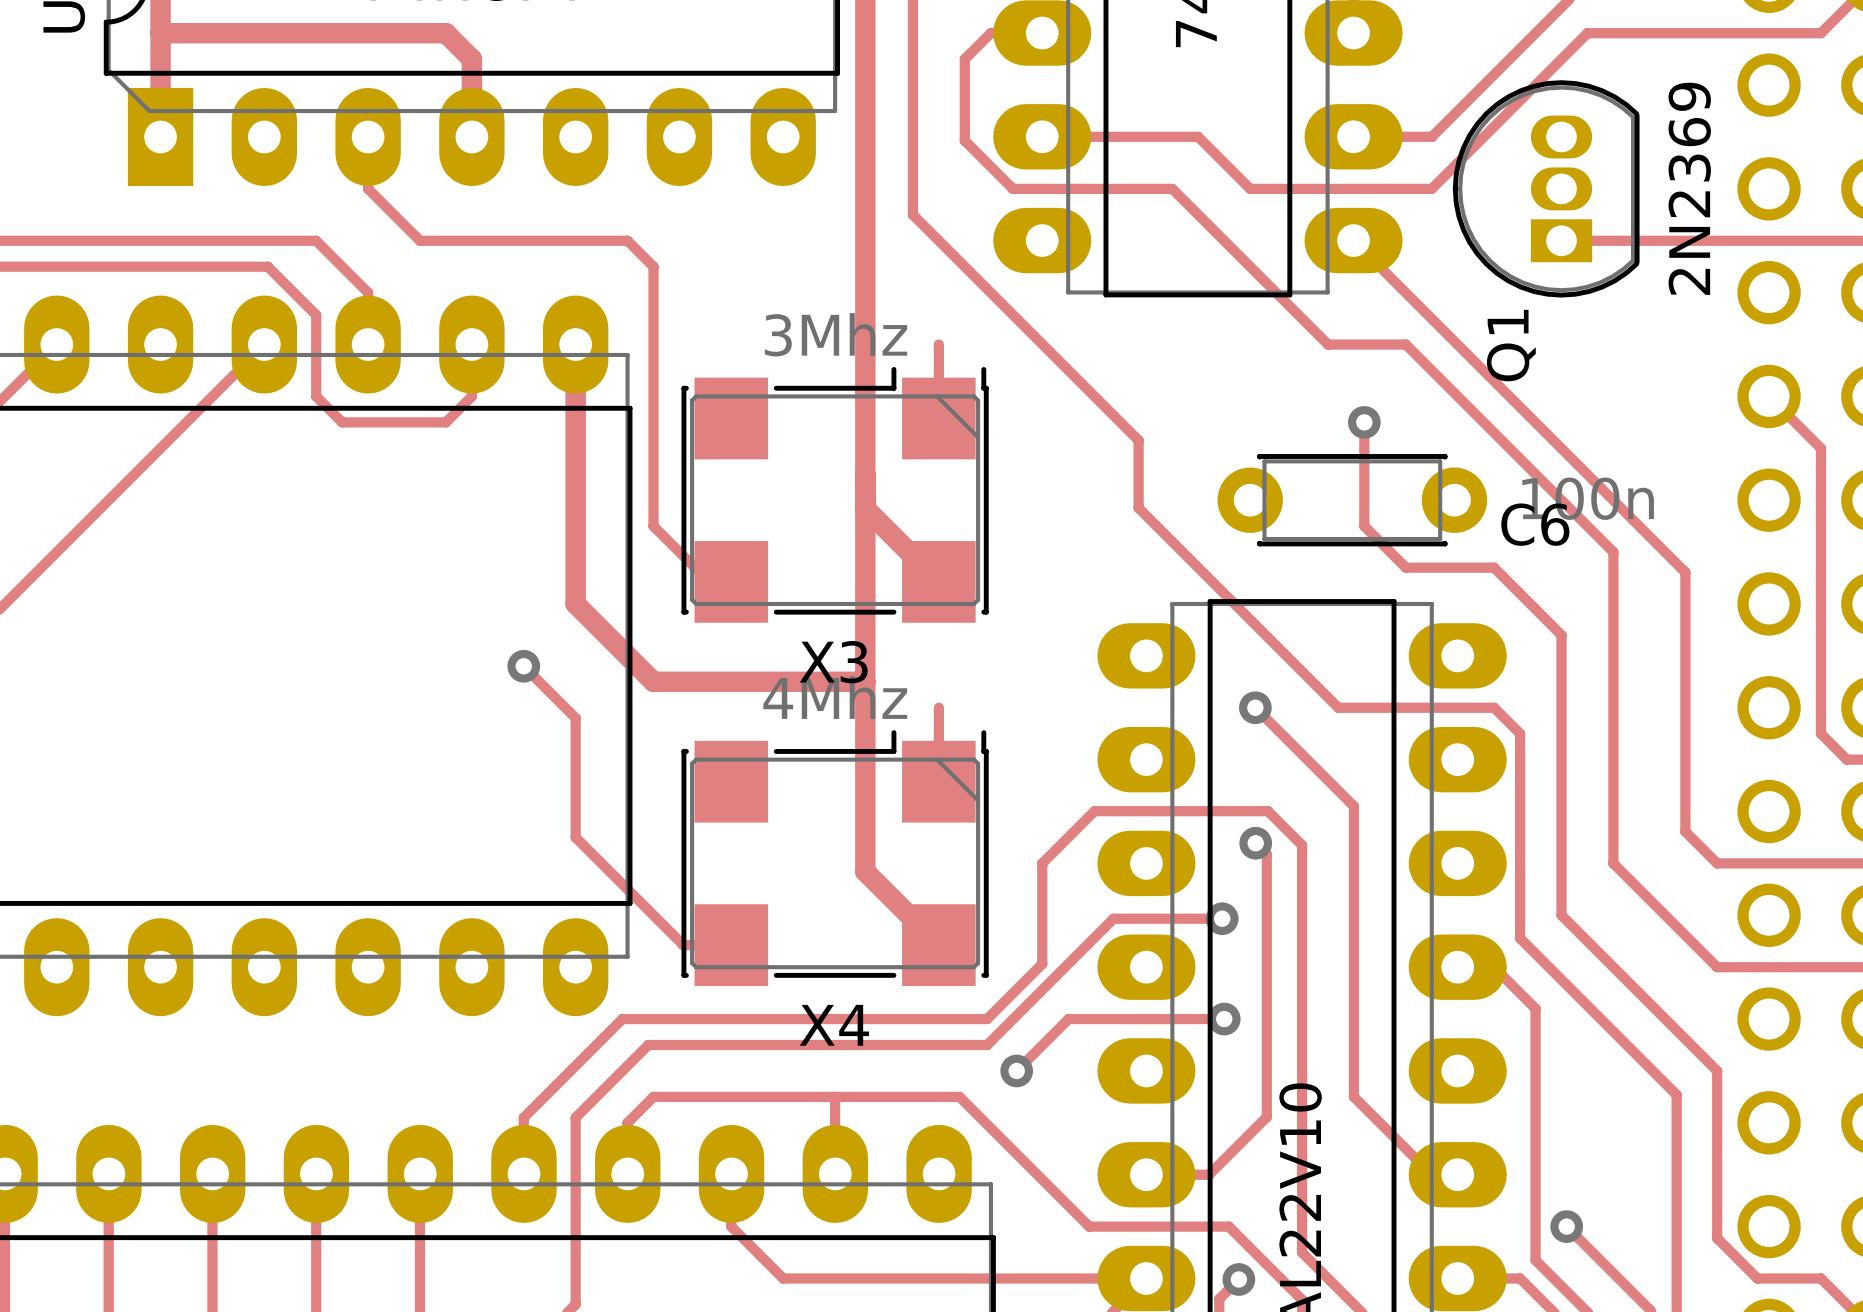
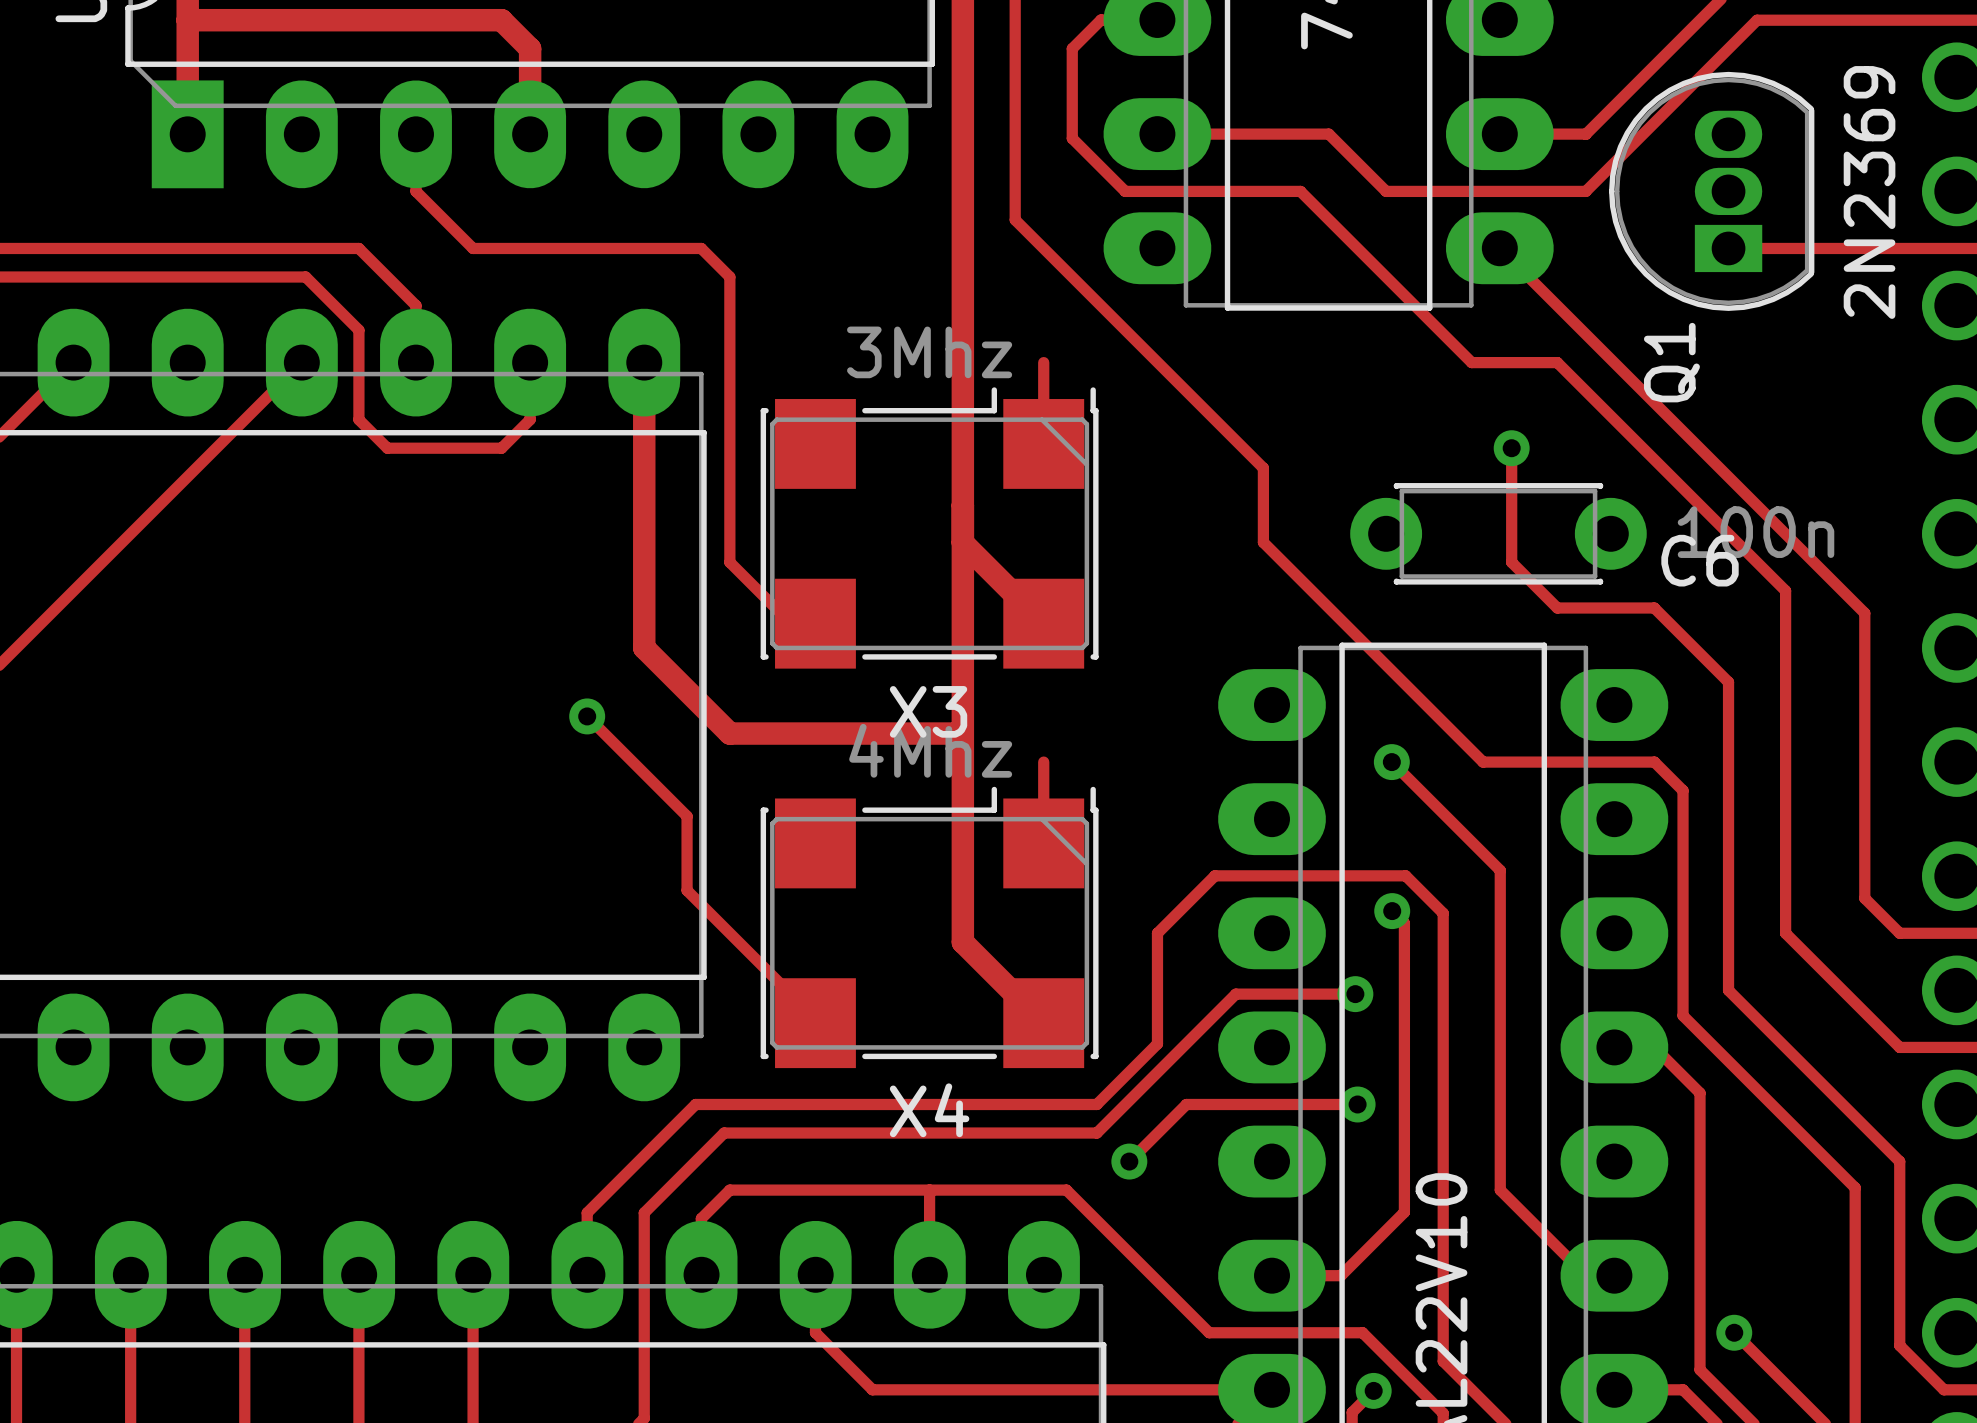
track: (575, 718) (575, 837) (683, 945) (731, 945) -> (644, 773) (687, 816) (687, 890) (815, 1018)

